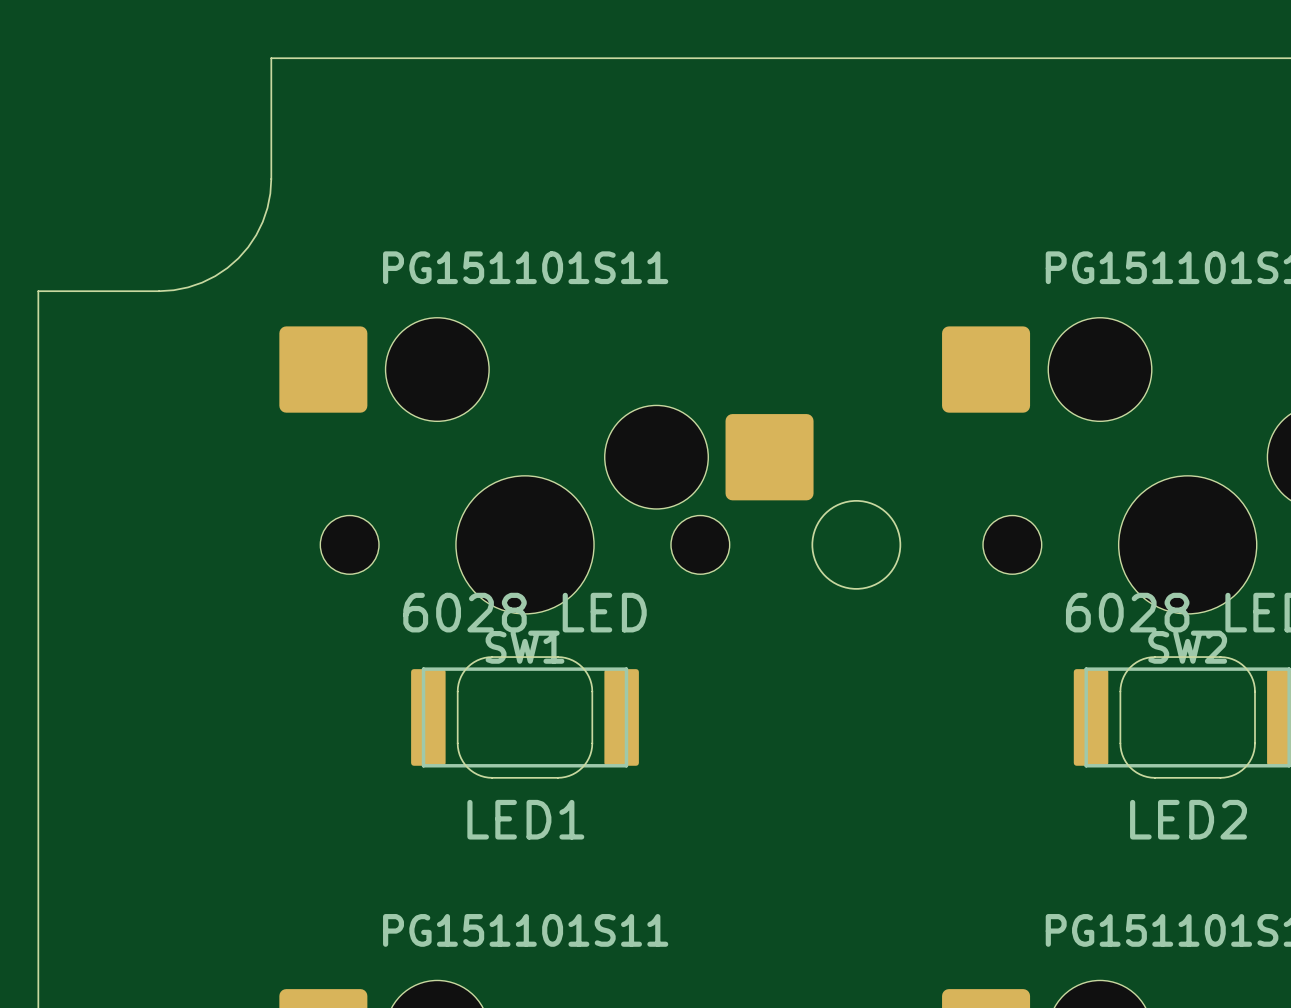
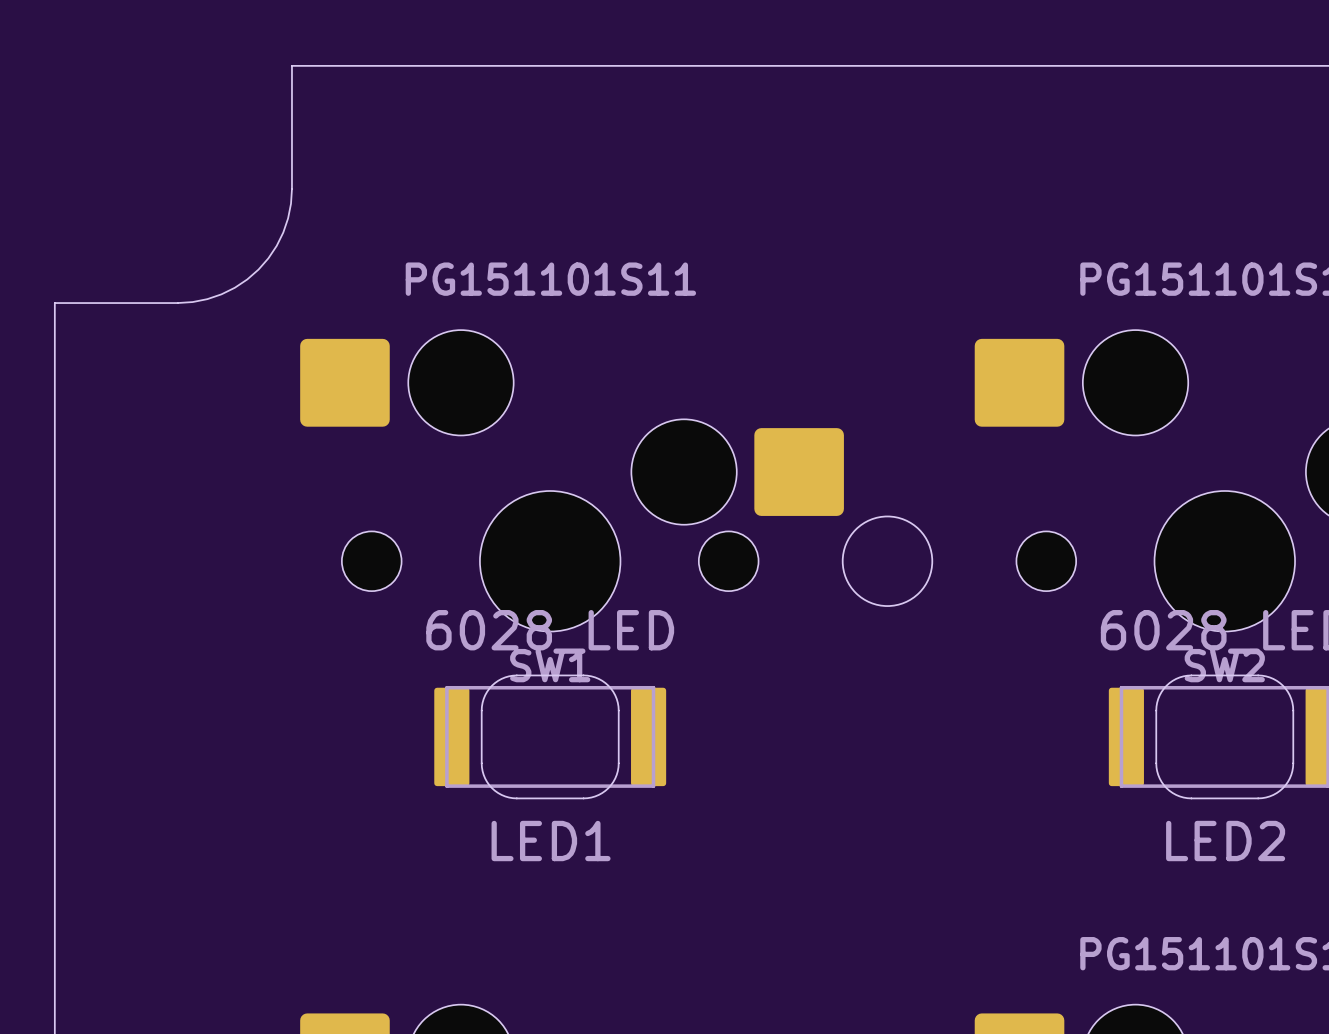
part value: PG151101S11 (525, 930) -> none

